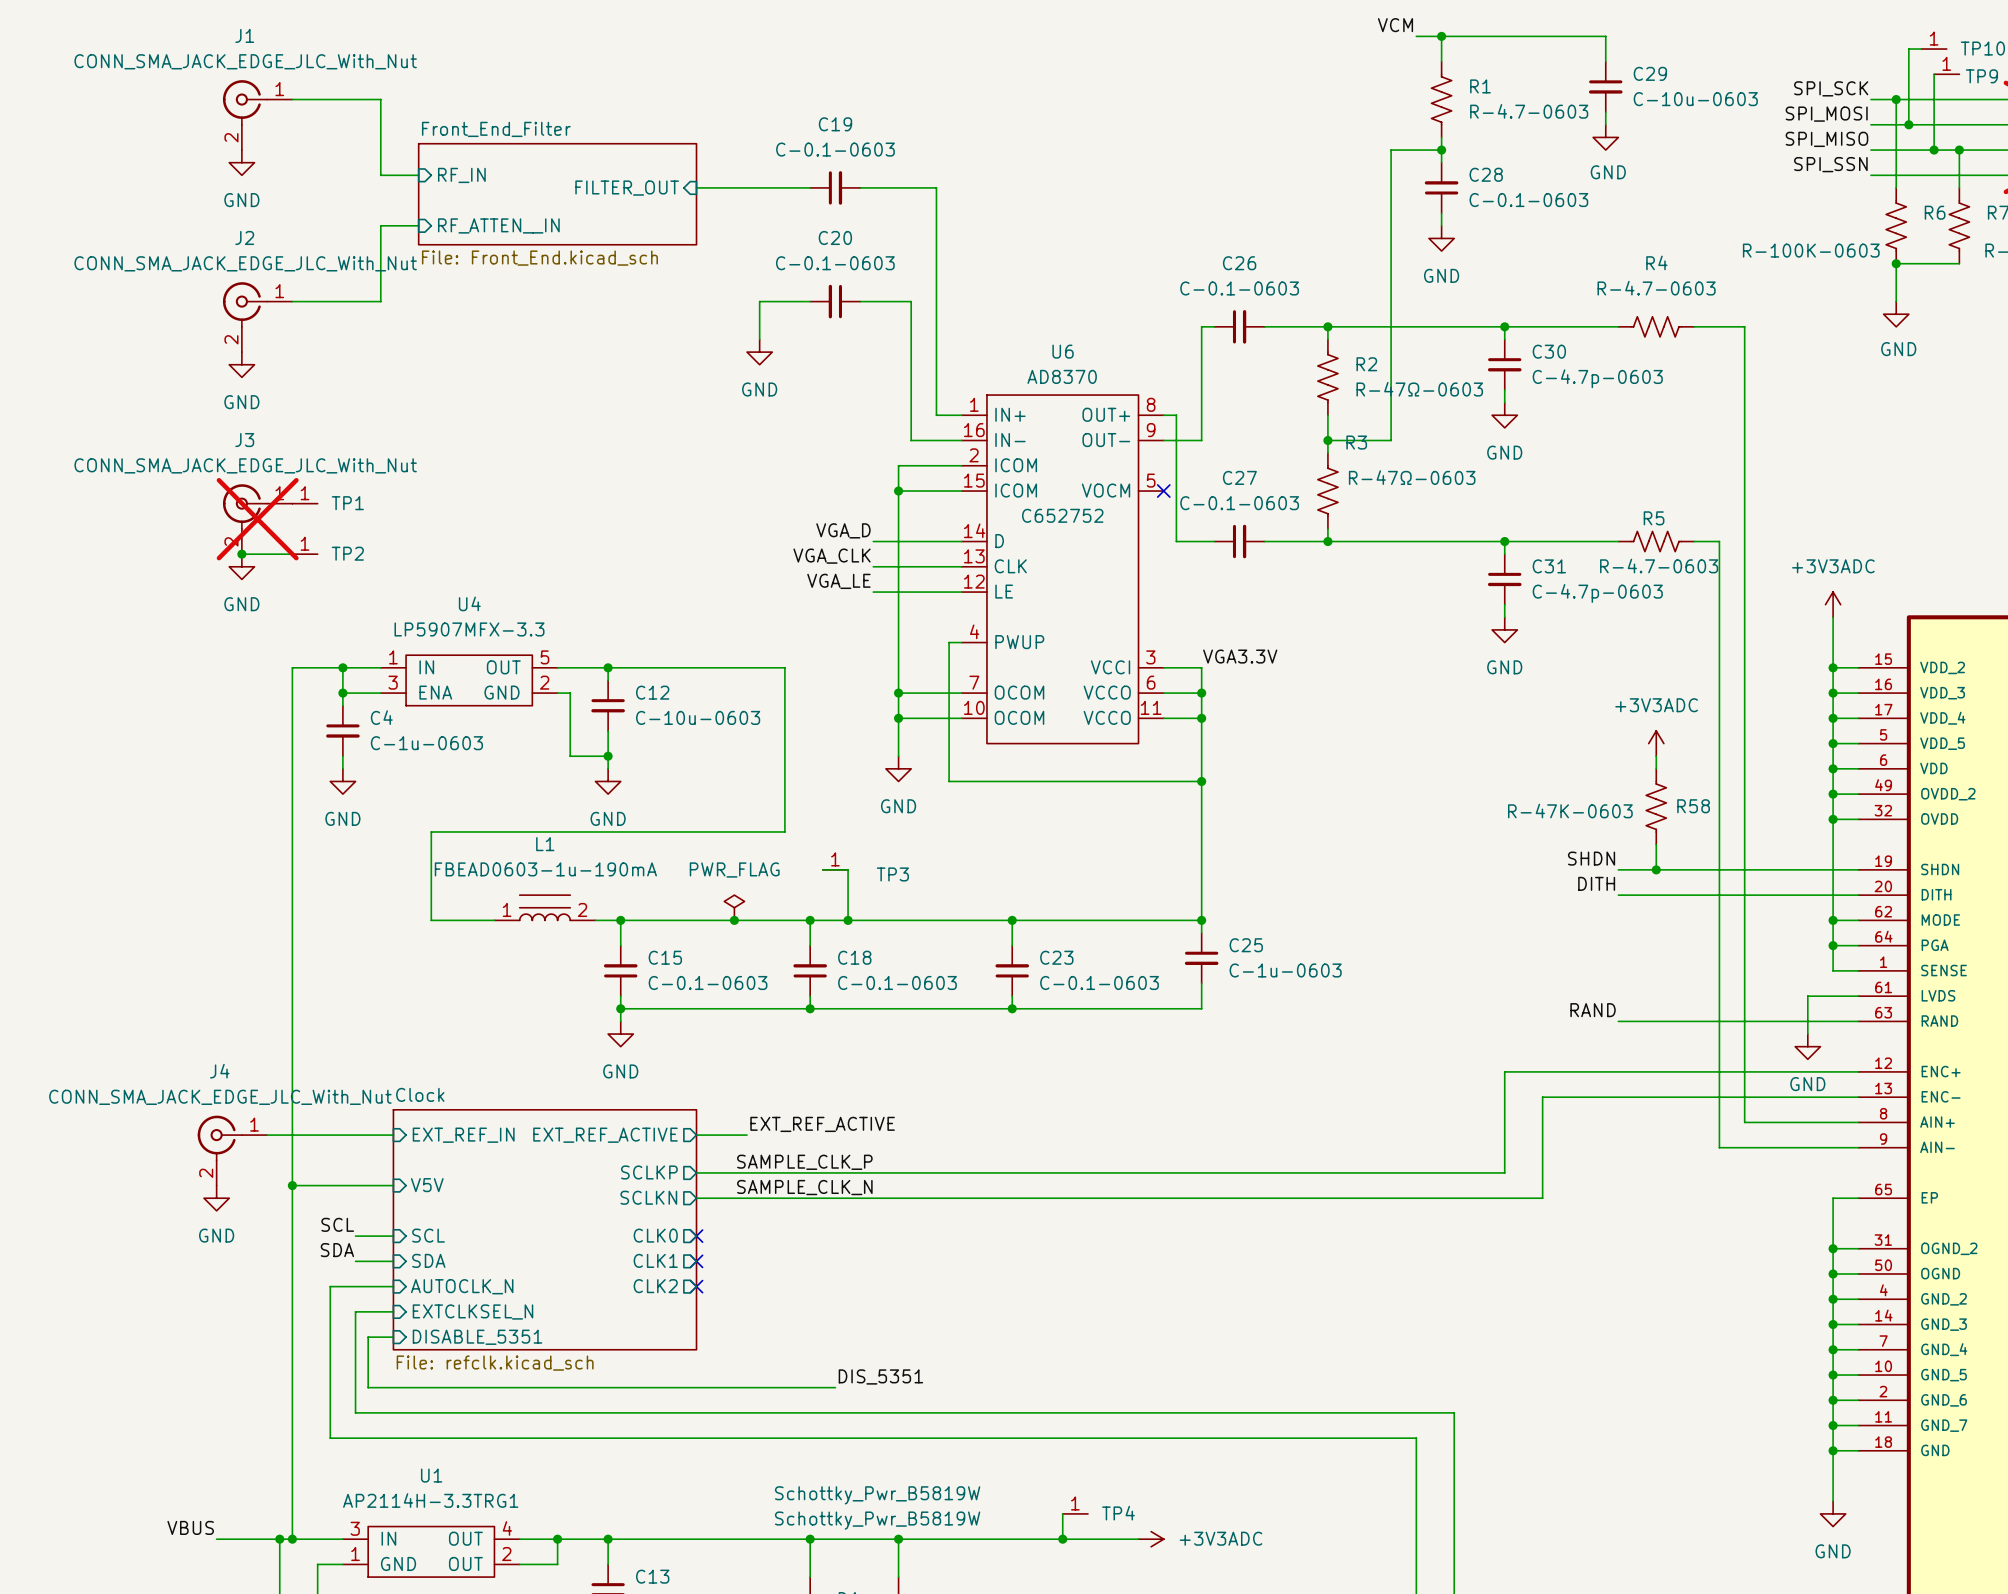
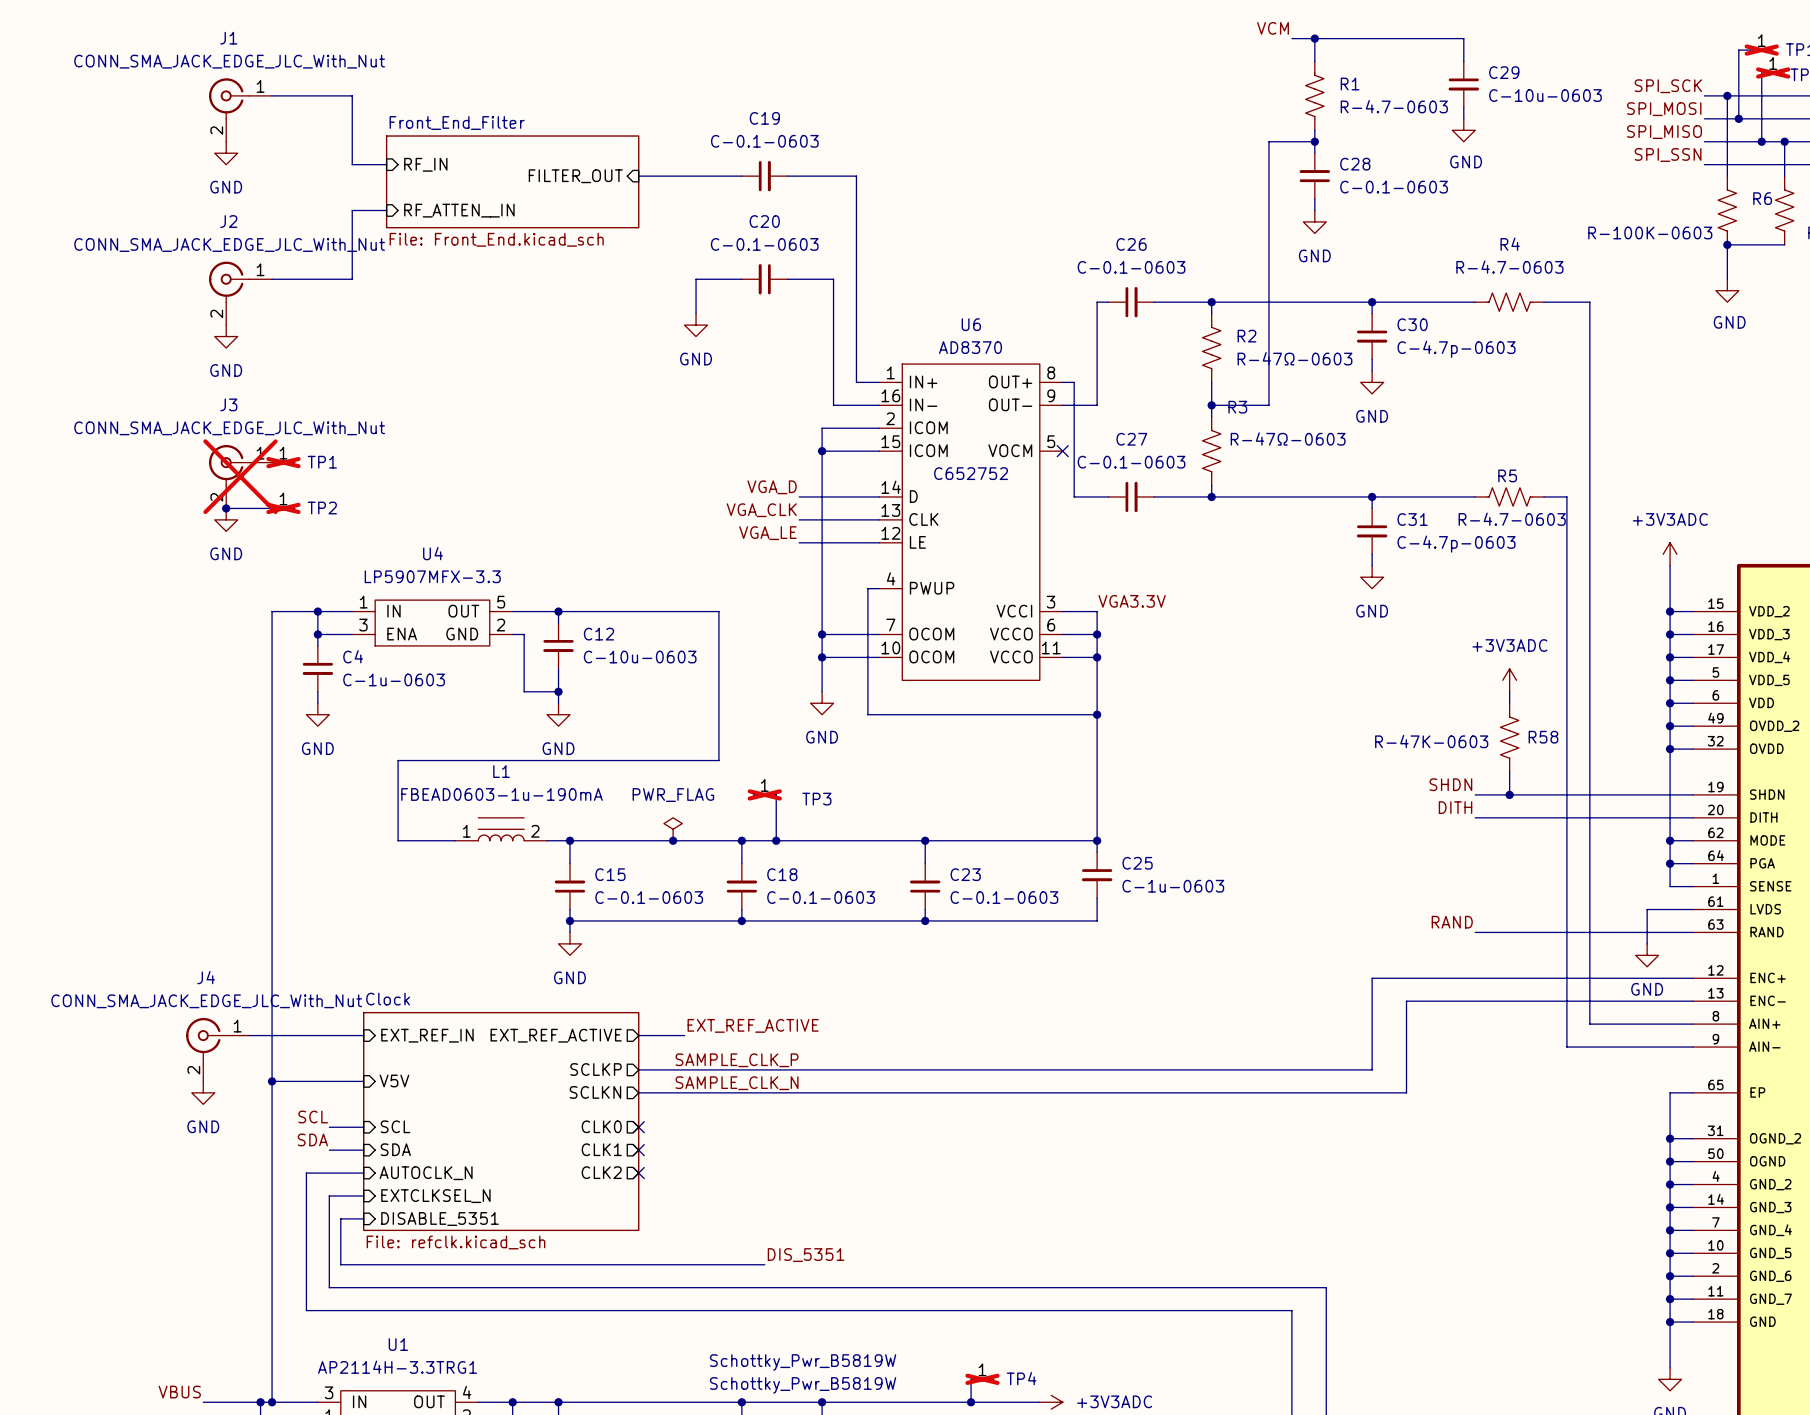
TP10 do-not-place cross: none -> (1761, 50)
TP9 do-not-place cross: none -> (1773, 72)
TP1 do-not-place cross: none -> (283, 462)
TP2 do-not-place cross: none -> (283, 508)
TP3 do-not-place cross: none -> (764, 794)
TP4 do-not-place cross: none -> (982, 1379)

